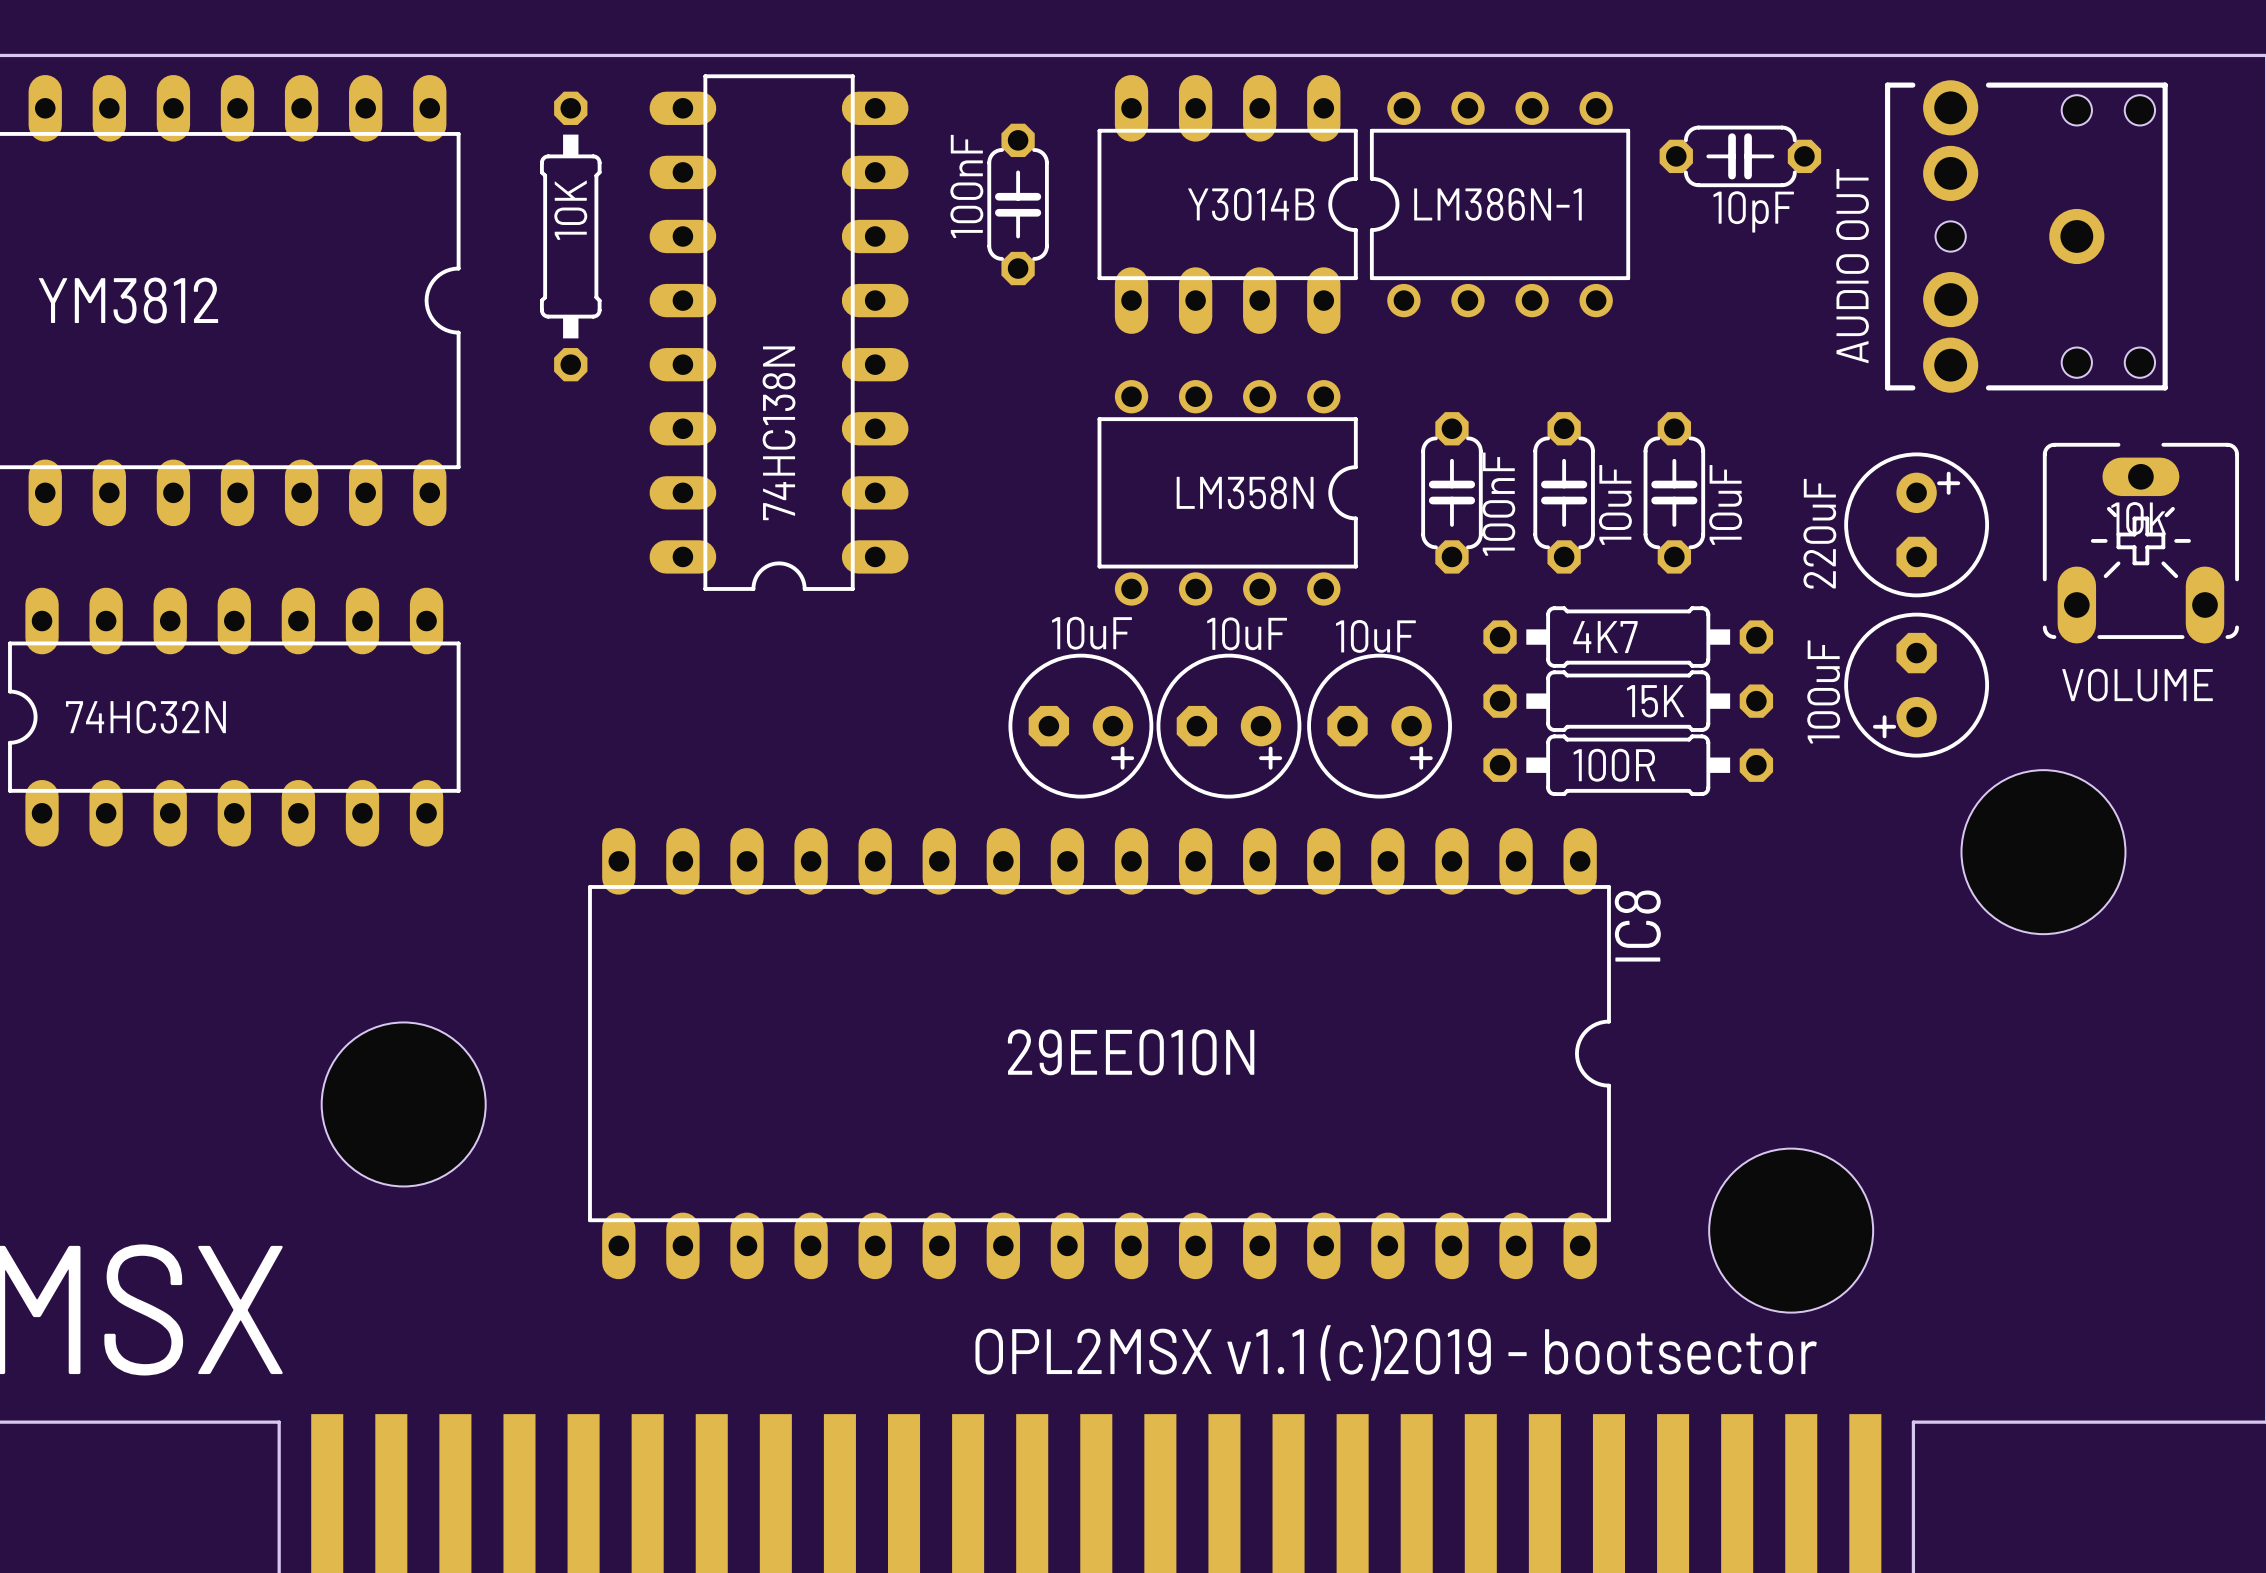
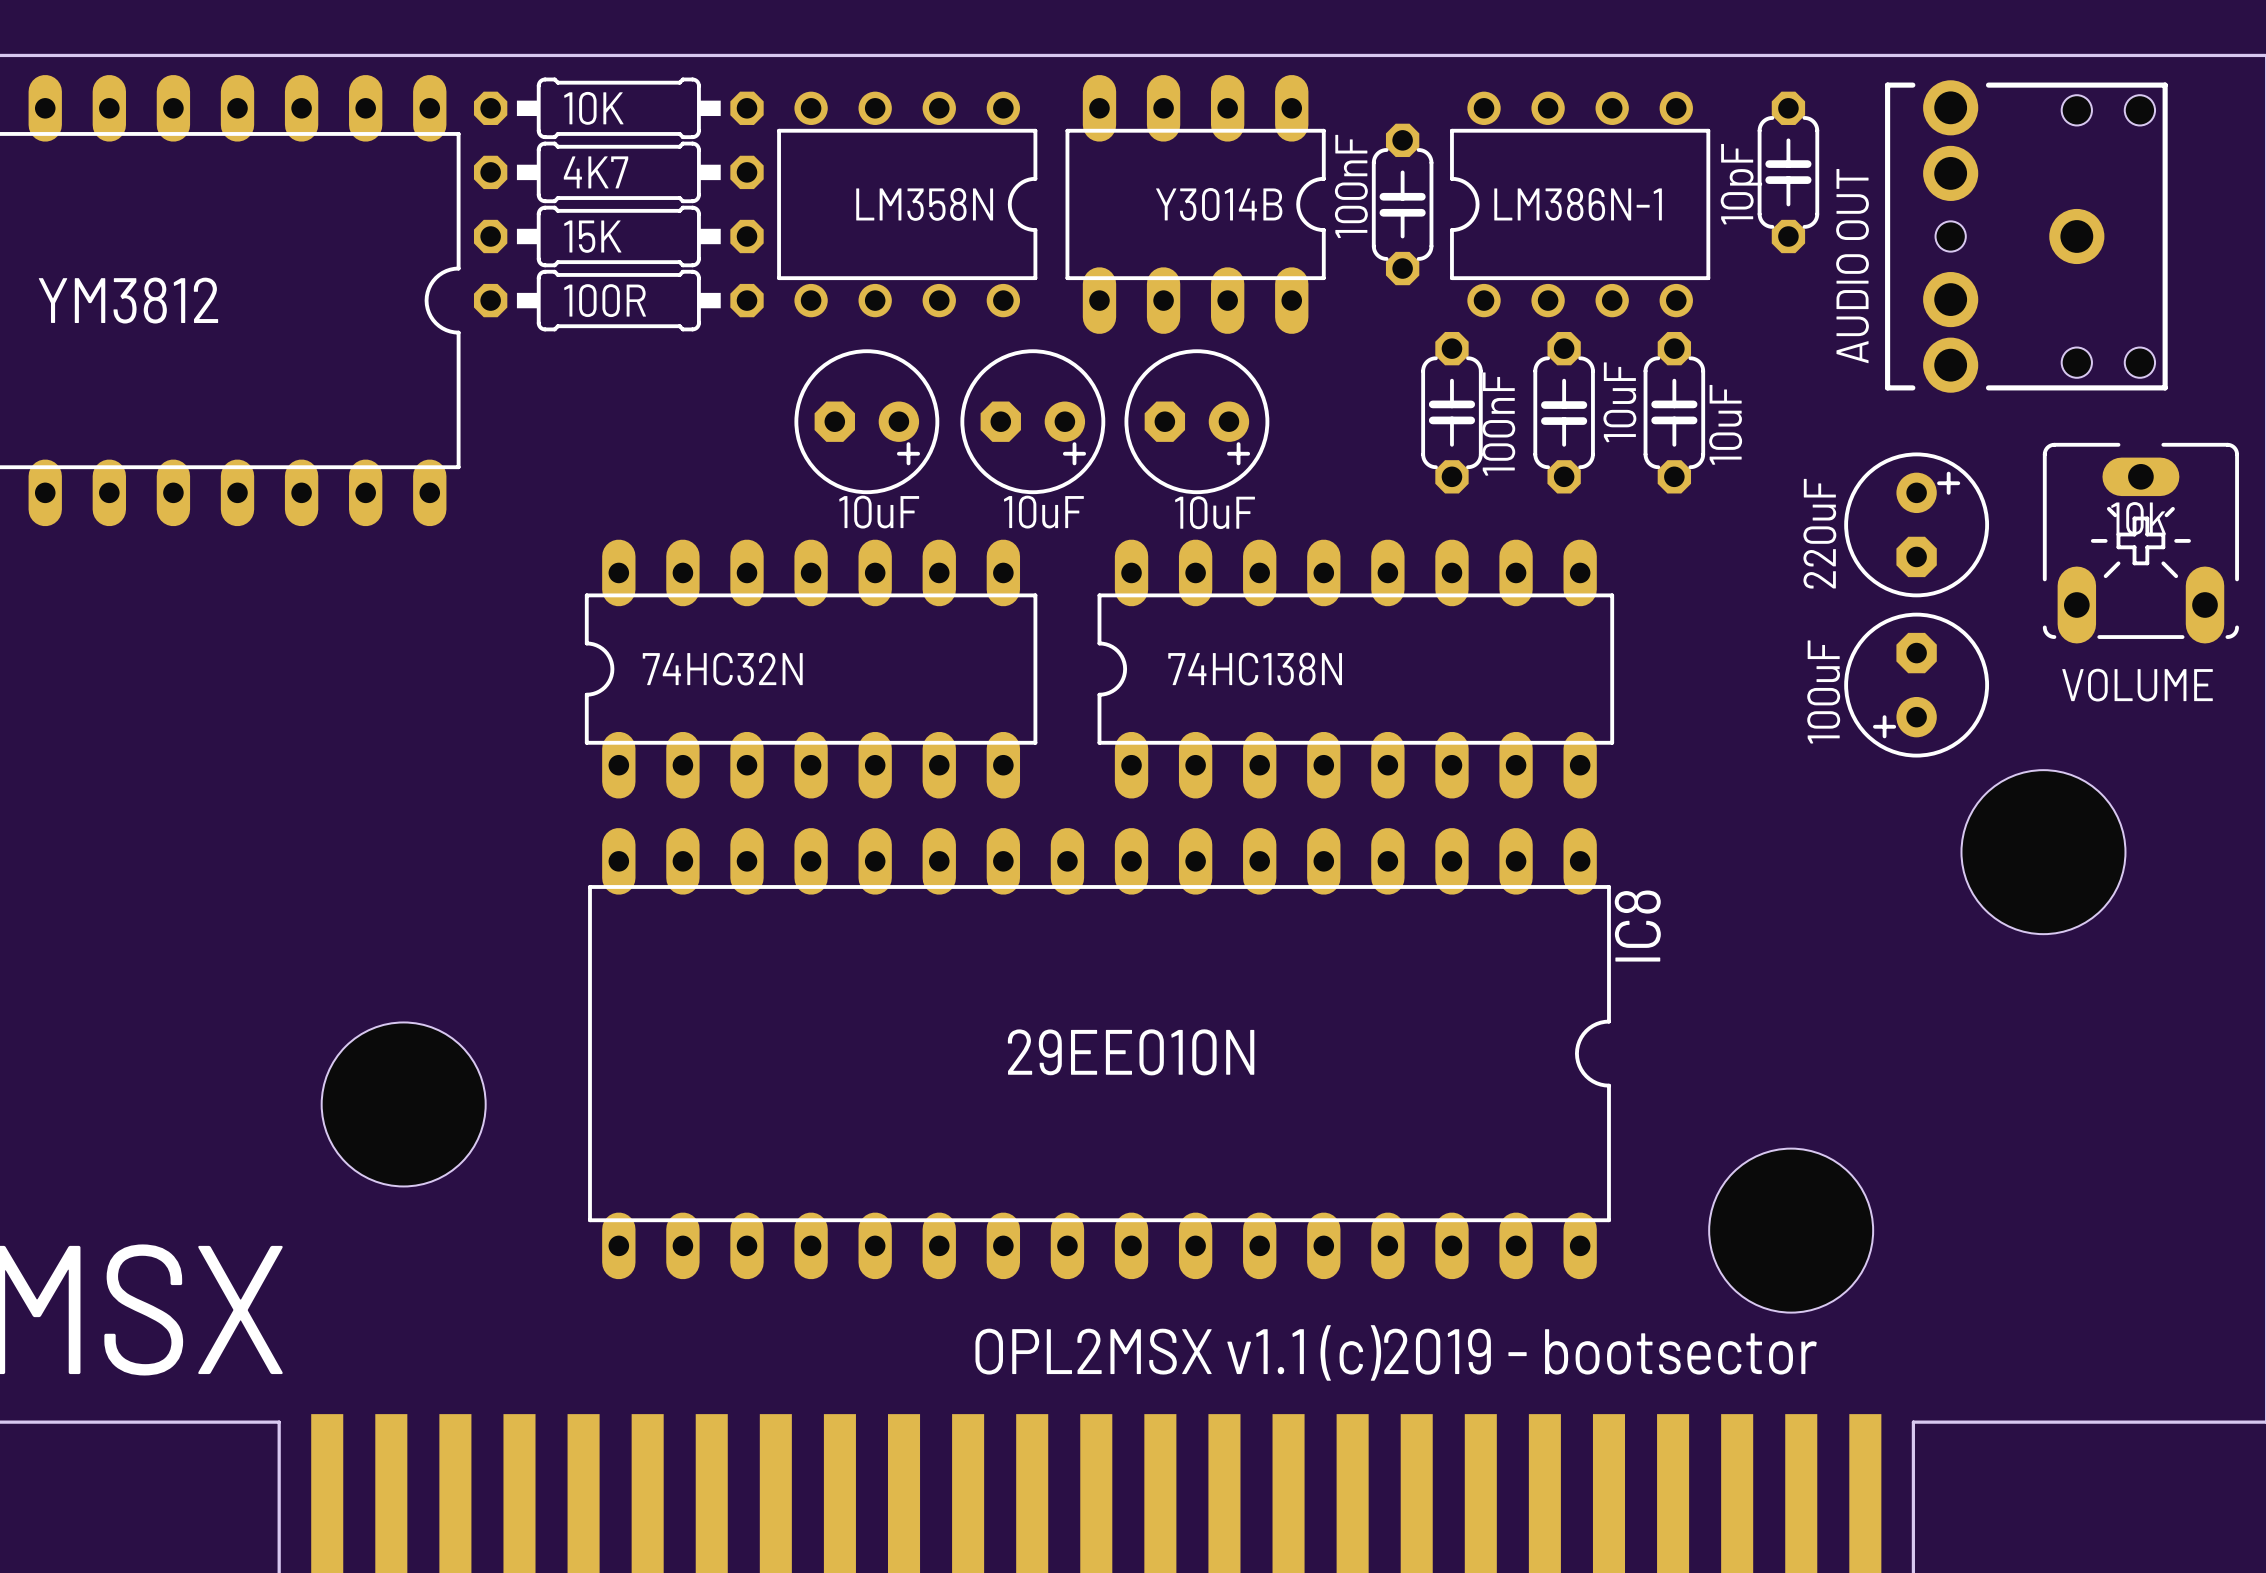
part rotation: 0° (1740, 156) -> 90° clockwise (1788, 172)
part: none -> 4K7 (618, 172)
part: 100nF (1018, 204) -> none
part position: (1227, 204) -> (1195, 204)
part: none -> 100nF (1402, 204)
part position: (1500, 204) -> (1580, 204)
part rotation: 0° (570, 236) -> 90° clockwise (618, 108)
part: none -> 15K (618, 236)
part: none -> 100R (618, 300)
part: 74HC138N (779, 332) -> none
part: none -> 10uF (1564, 412)
part: none -> 10uF (1674, 412)
part: none -> 10uF (866, 421)
part: none -> 10uF (1032, 421)
part: none -> 10uF (1196, 421)
part position: (1227, 492) -> (907, 204)
part position: (1451, 492) -> (1451, 412)
part: 10uF (1564, 492) -> none
part: 10uF (1674, 492) -> none
part: 4K7 (1628, 637) -> none
part: none -> 74HC138N (1355, 669)
part: 15K (1628, 701) -> none
part position: (234, 717) -> (811, 669)
part: 10uF (1080, 726) -> none
part: 10uF (1228, 726) -> none
part: 10uF (1379, 726) -> none
part: 100R (1628, 765) -> none

